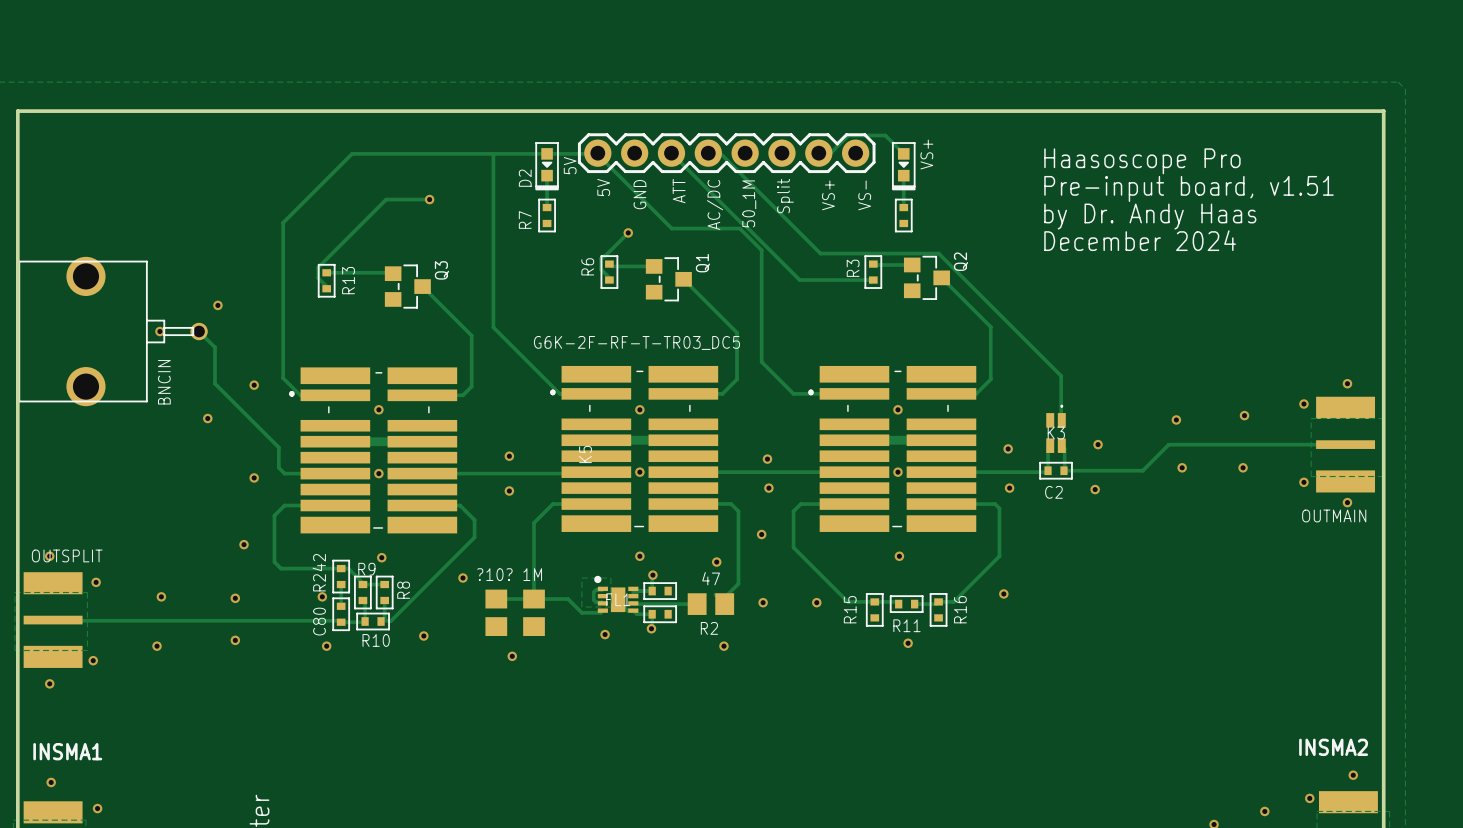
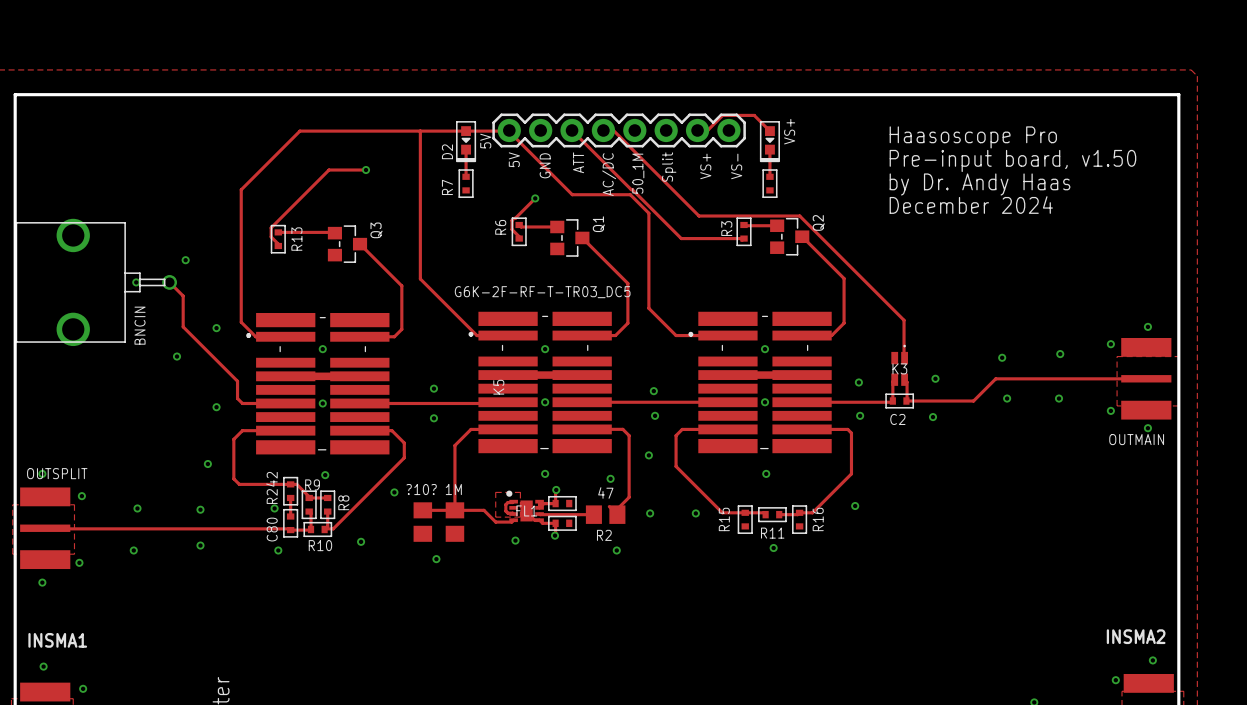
text: Pre-input board, v1.51 (1189, 188) -> Pre-input board, v1.50 (1012, 160)
via: (1264, 811) -> none

